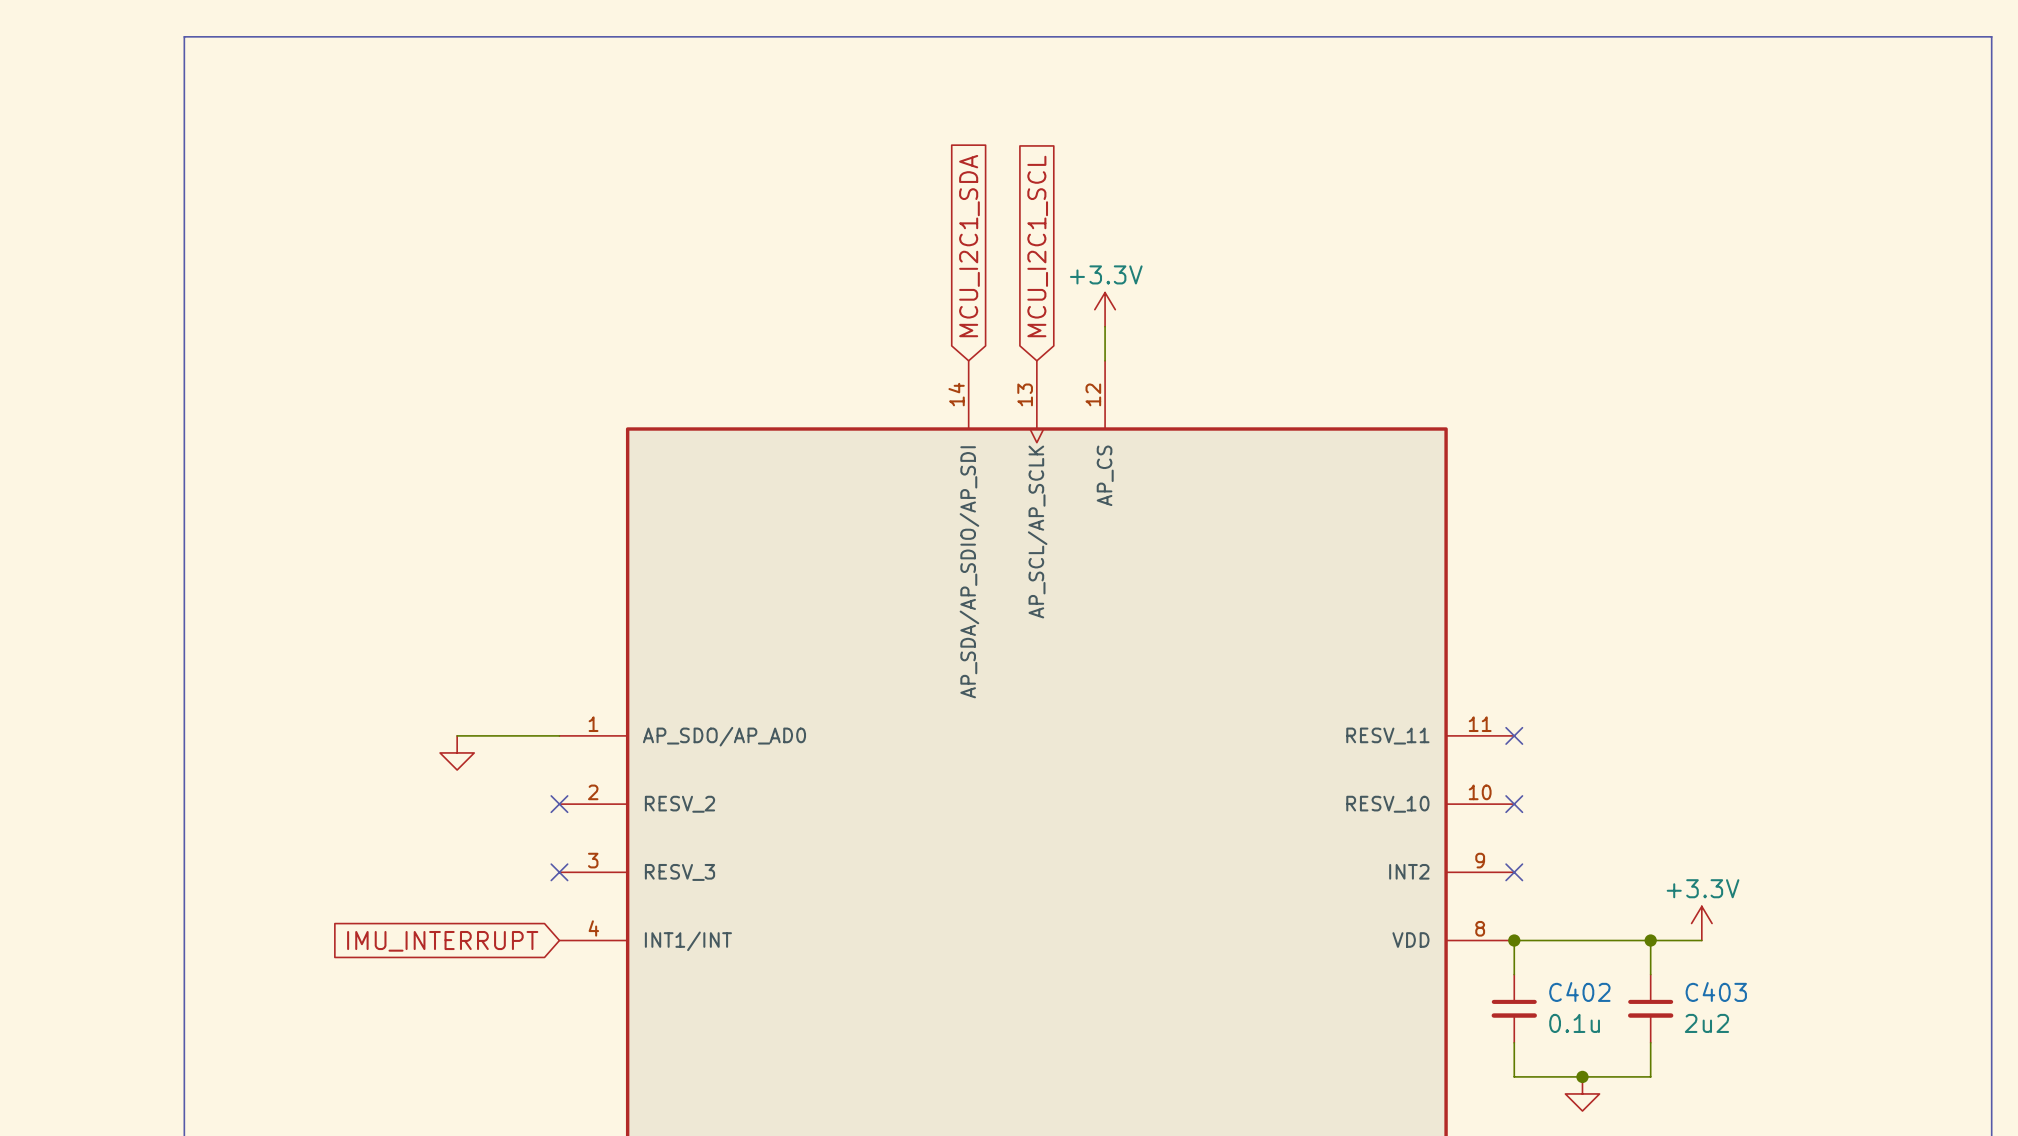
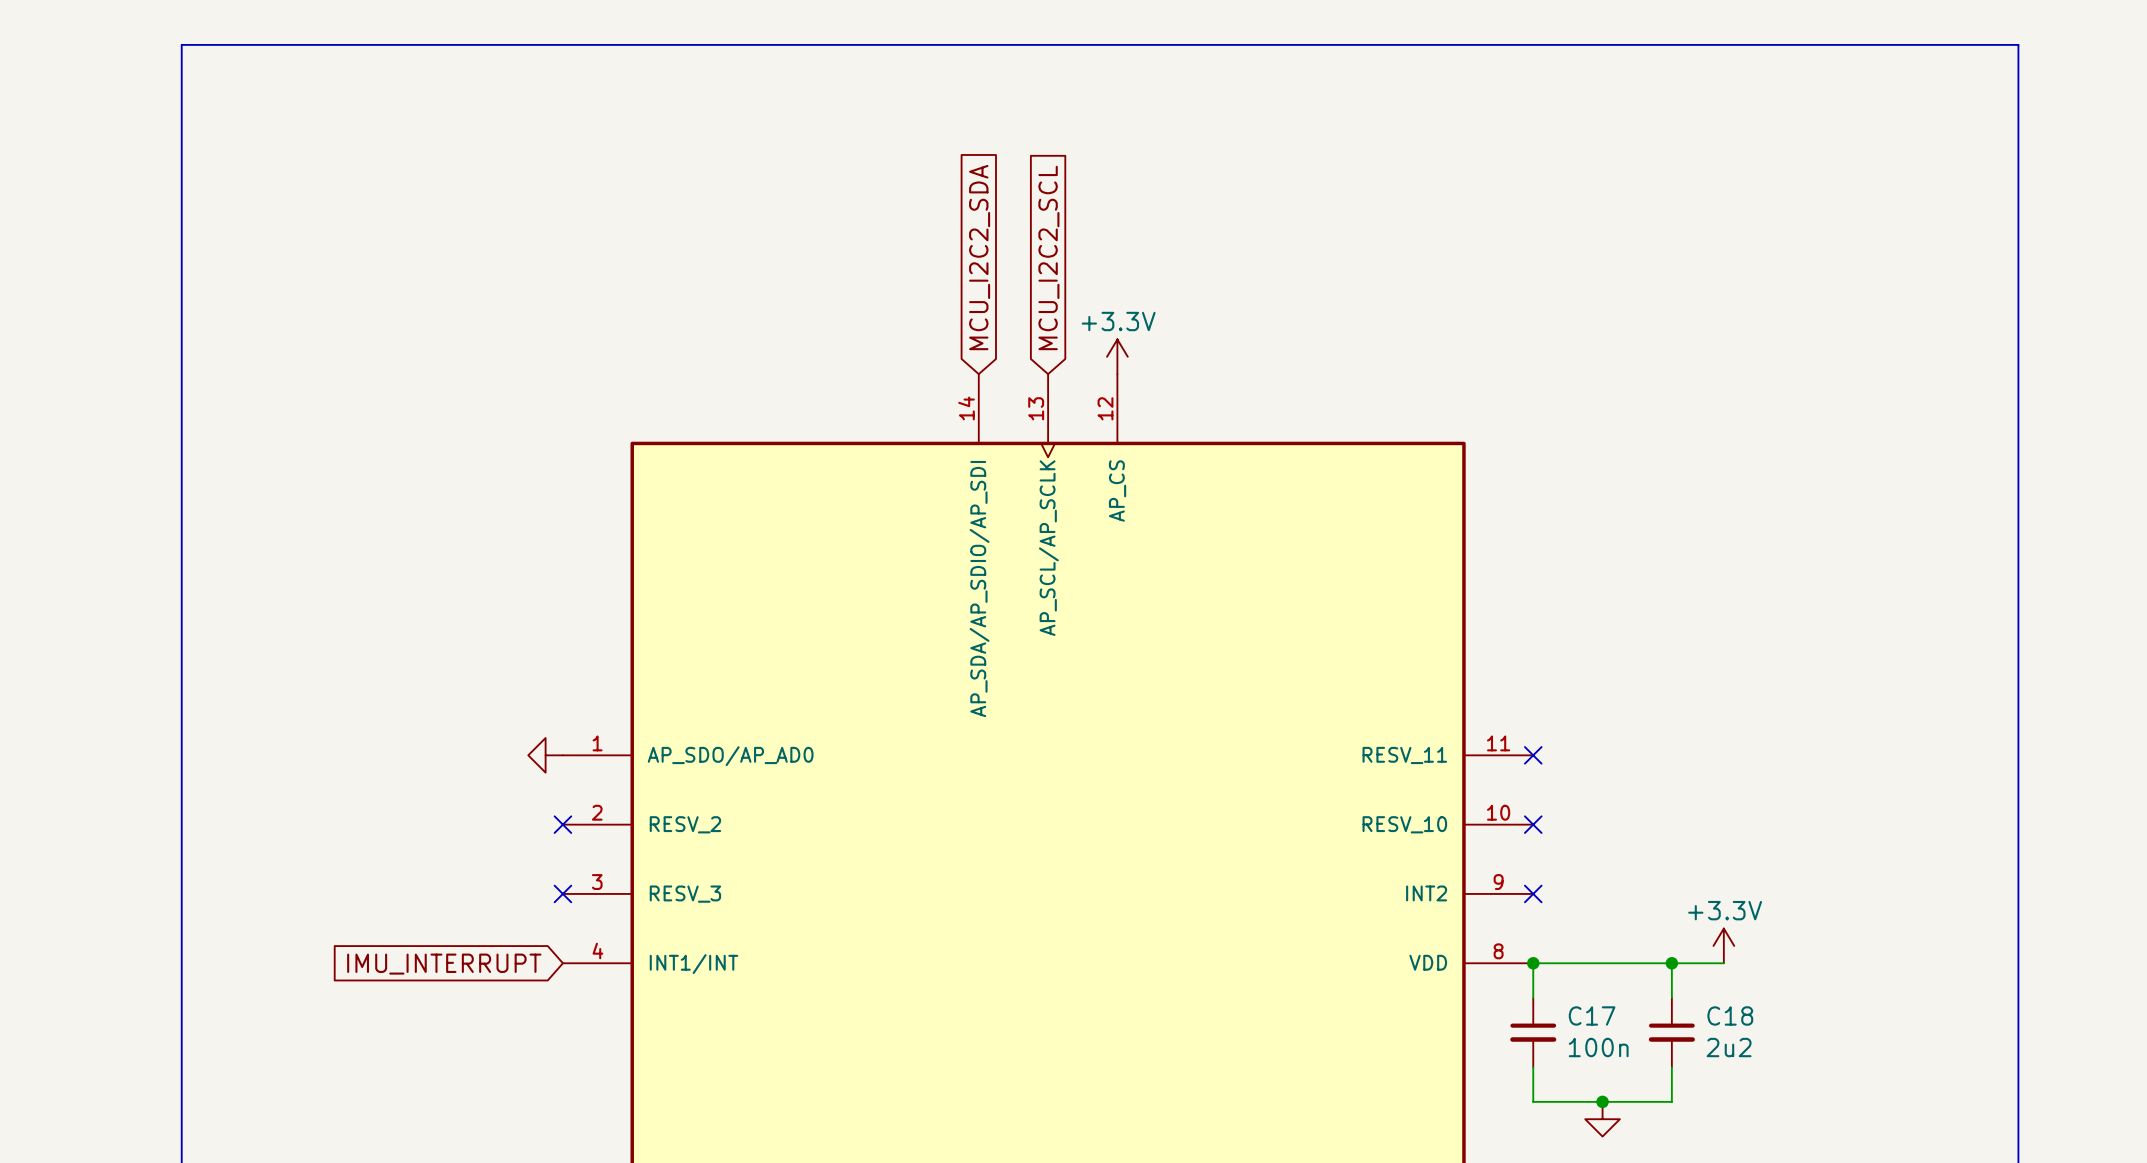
global label: MCU_I2C1_SDA (969, 246) -> MCU_I2C2_SDA (979, 257)
global label: MCU_I2C1_SCL (1037, 246) -> MCU_I2C2_SCL (1048, 257)
power symbol position: +3.3V (1105, 309) -> +3.3V (1117, 356)
wire: (457, 735) (559, 735) -> none
power symbol rotation: 0° (457, 752) -> 90° clockwise (545, 755)
power symbol position: (457, 752) -> (545, 755)
C402 name: C402 (1579, 991) -> C17 (1592, 1015)
C403 name: C403 (1716, 991) -> C18 (1730, 1015)
C402 value: 0.1u (1574, 1023) -> 100n (1598, 1047)

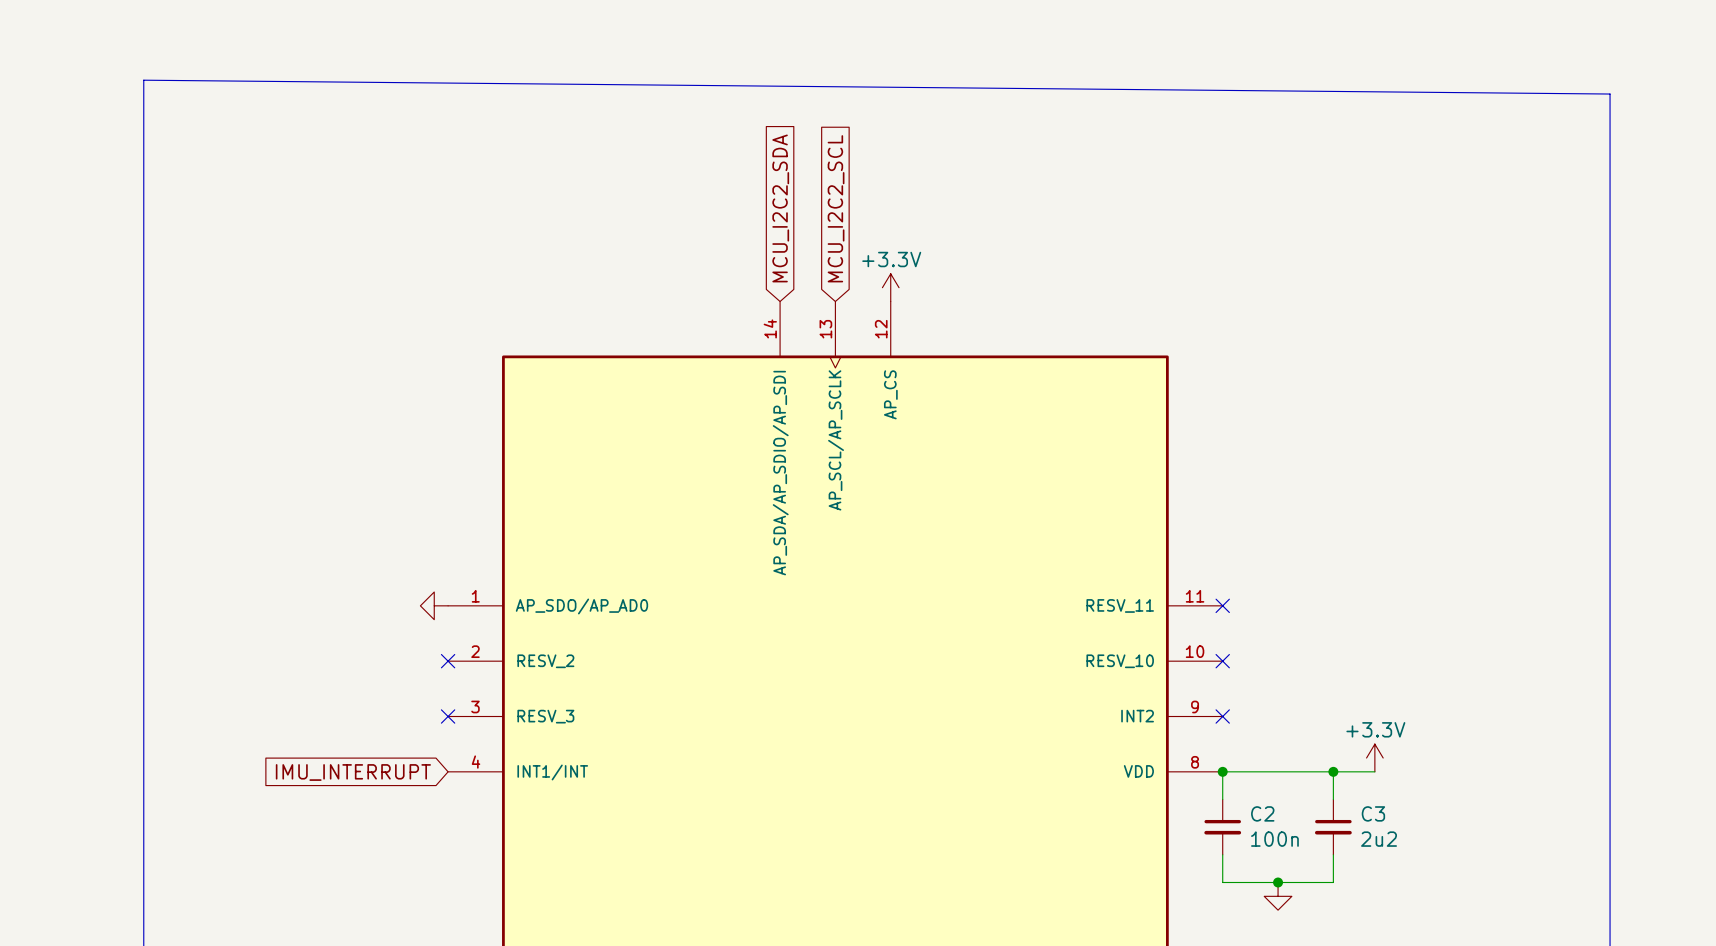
line: (181, 96) (181, 44) (2018, 44) (2018, 114) -> (143, 80) (1610, 94)
C17 name: C17 (1592, 1015) -> C2 (1262, 813)
C18 name: C18 (1730, 1015) -> C3 (1373, 813)

